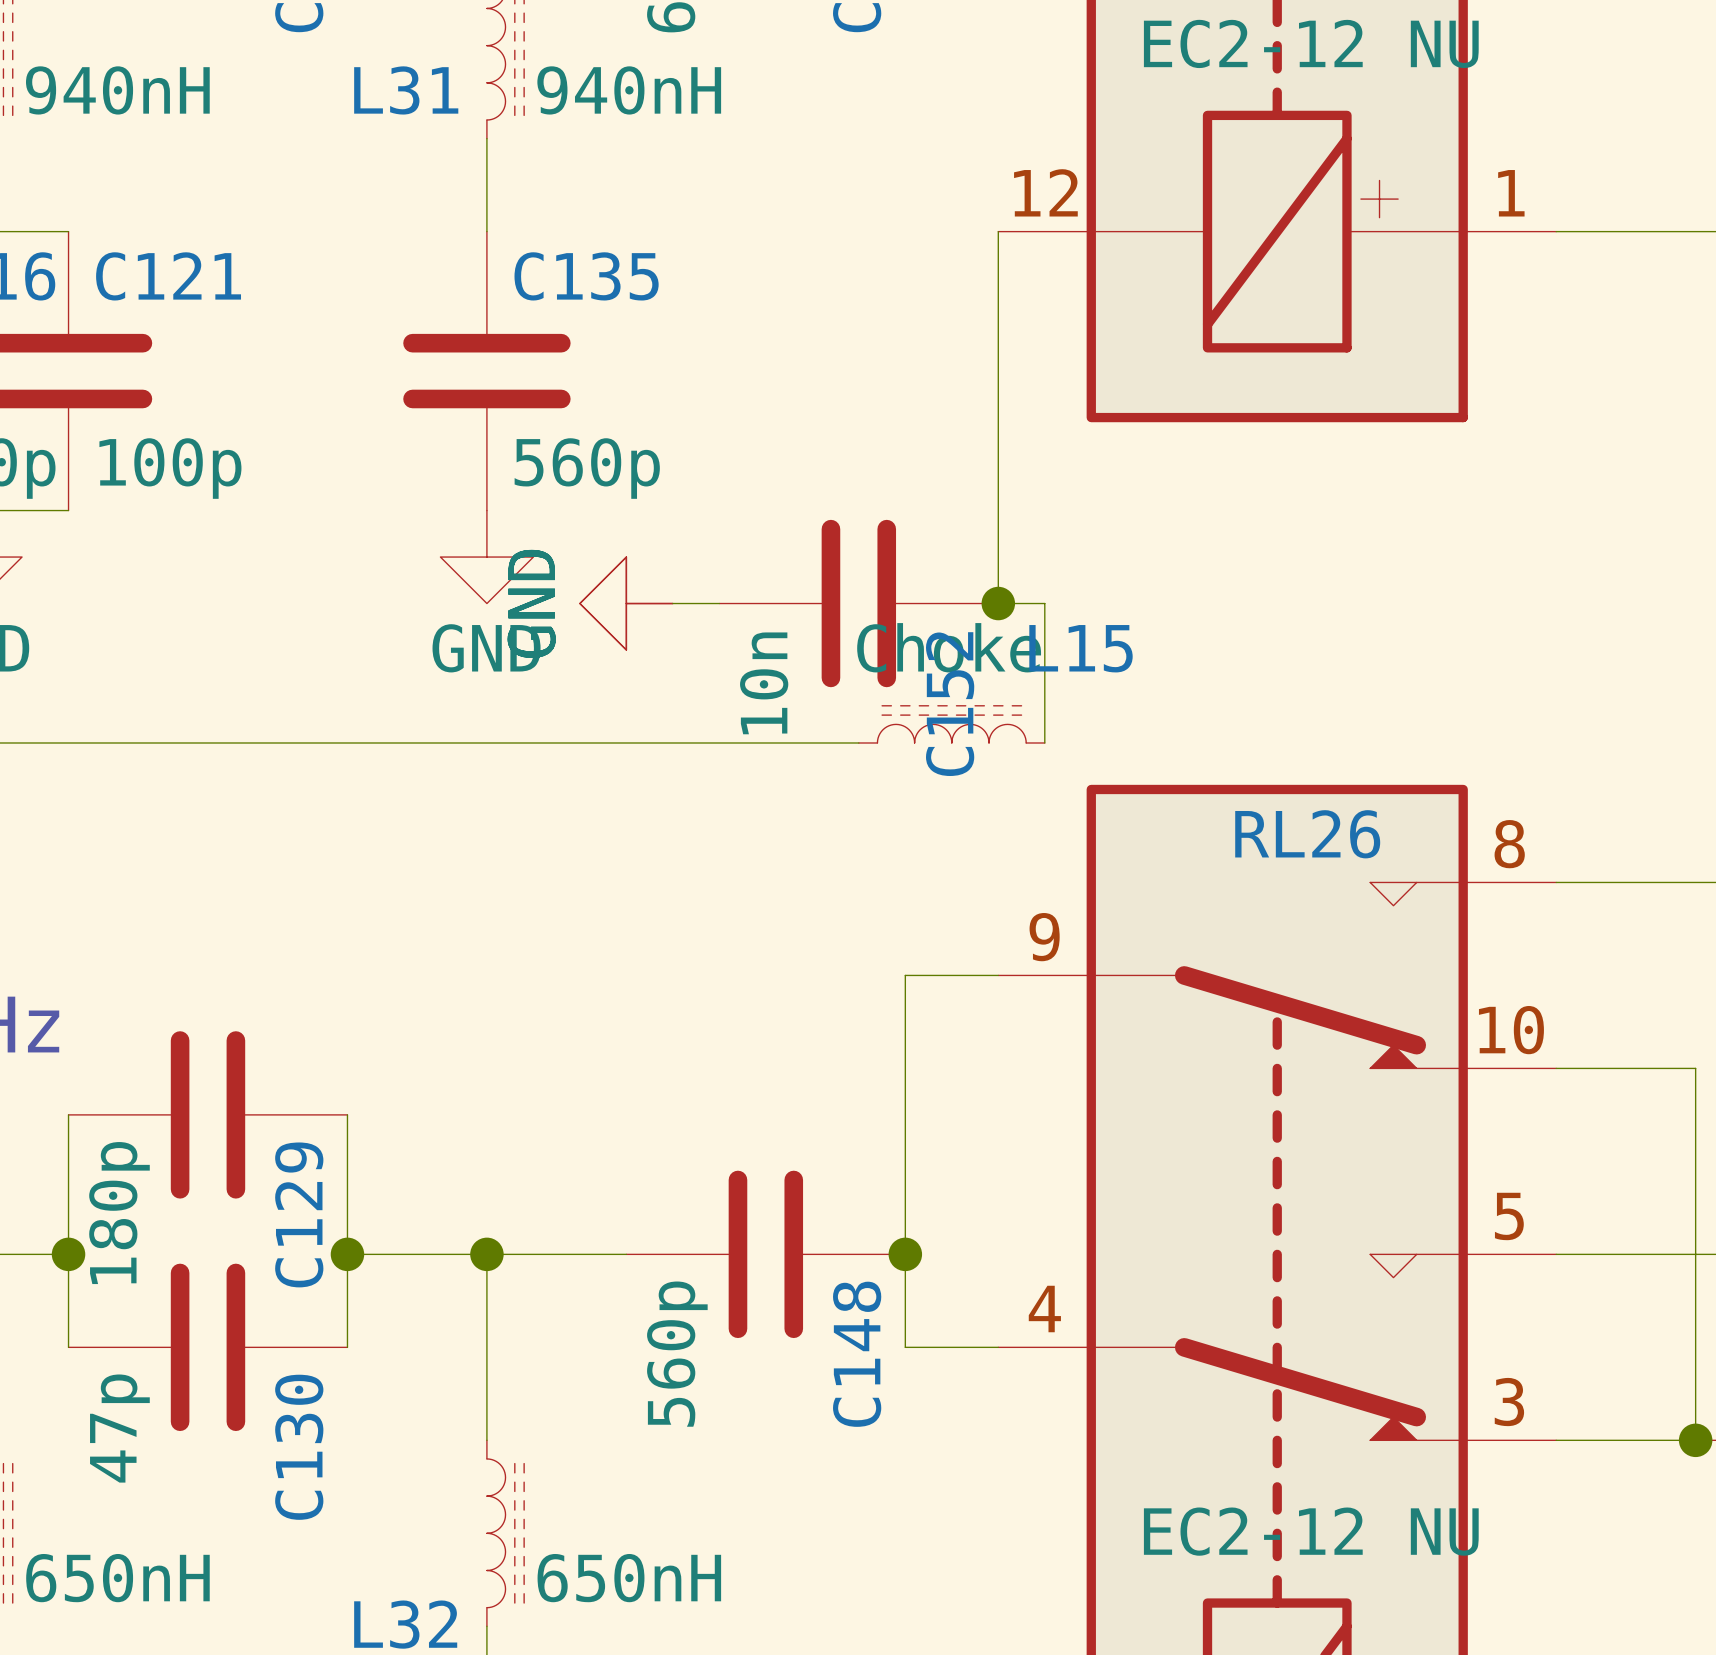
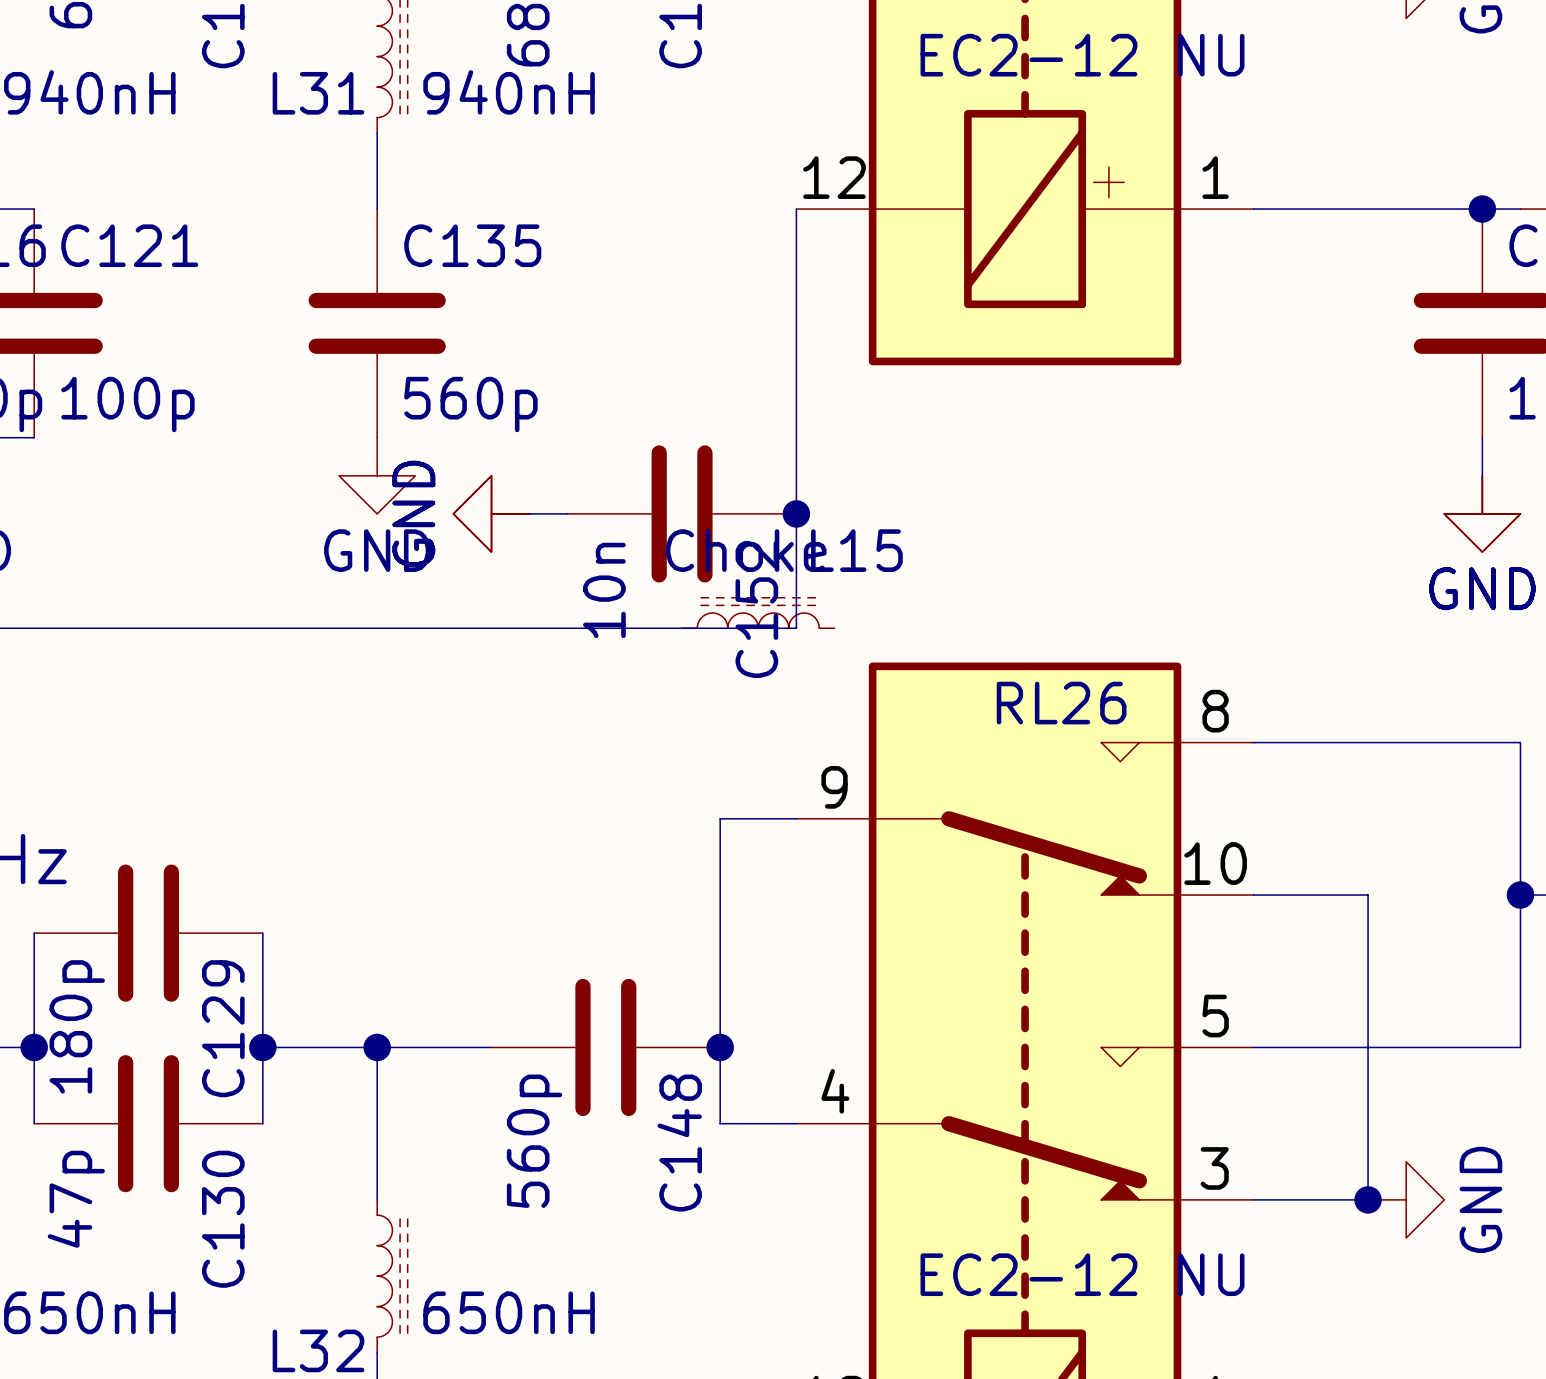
wire: (998, 603) (1044, 603) (1044, 742) -> (796, 513) (796, 628) (682, 628)

